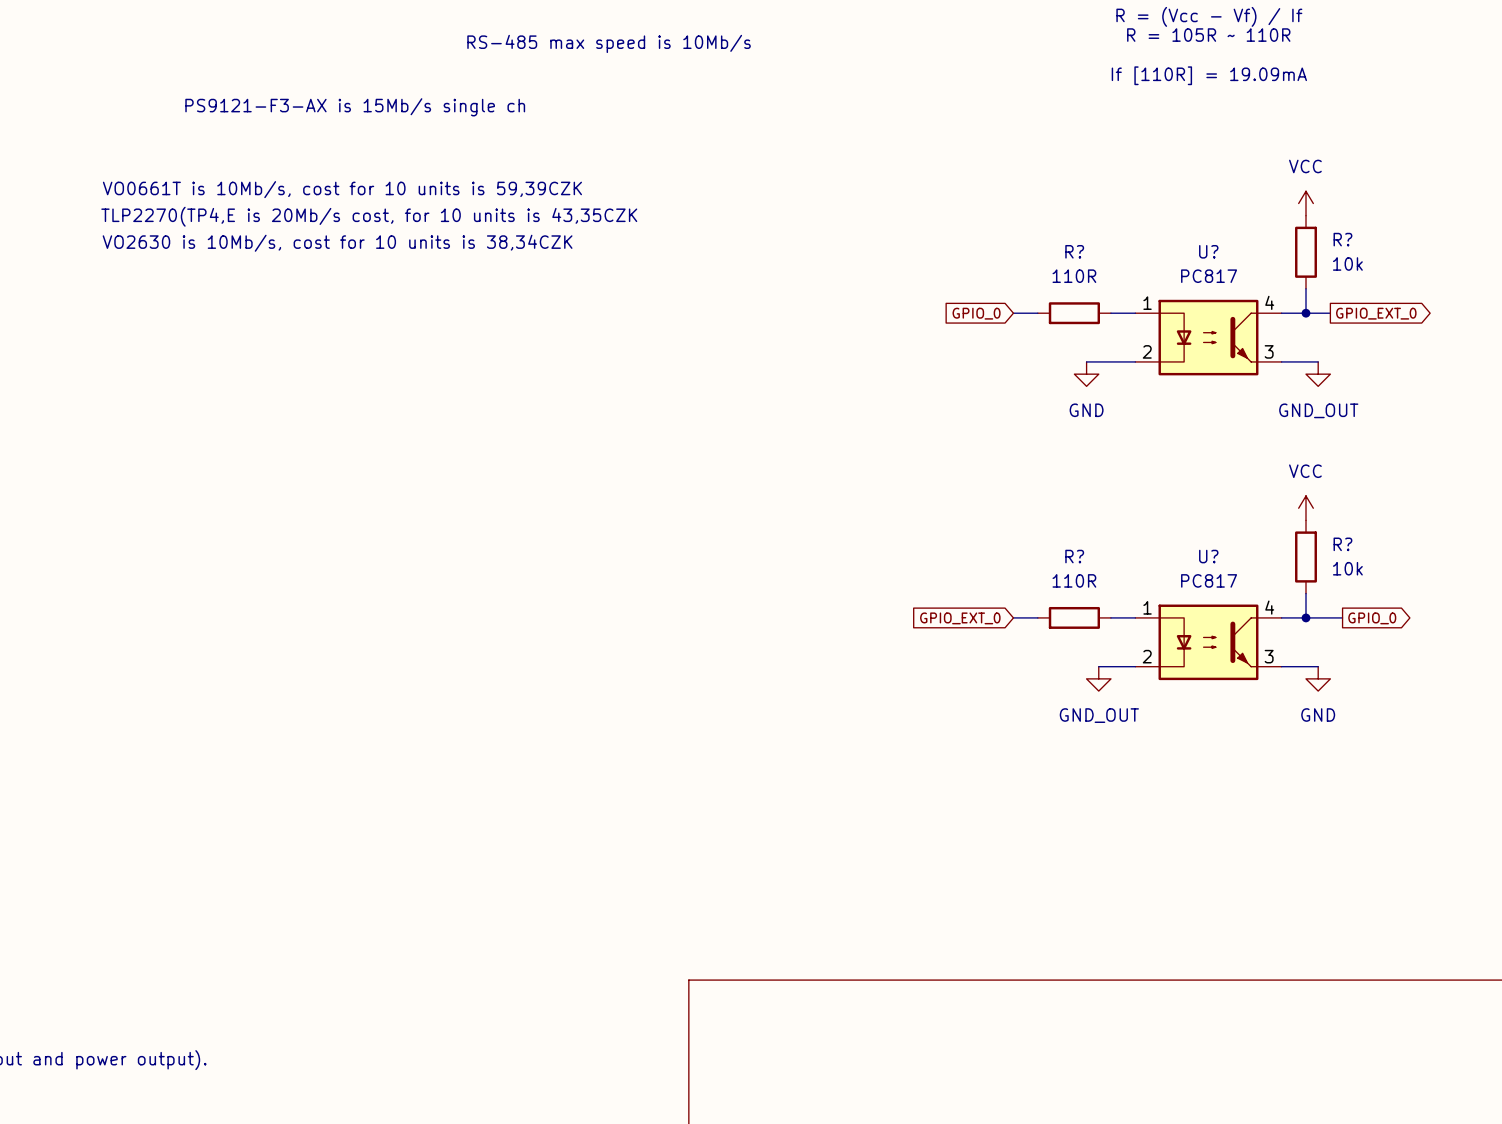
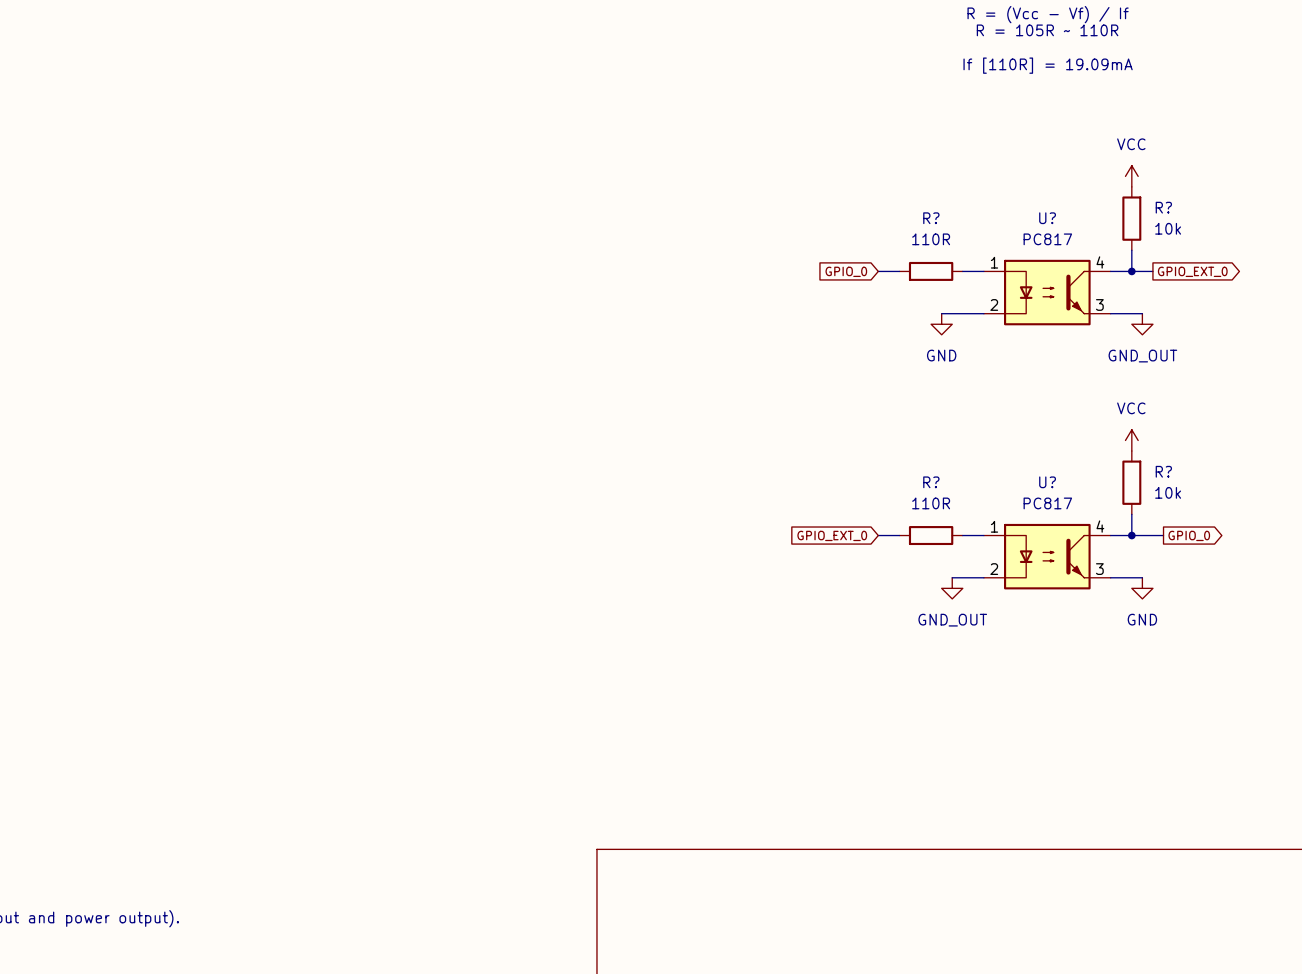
text: RS-485 max speed is 10Mb/s (609, 43) -> none
text: PS9121-F3-AX is 15Mb/s single ch (355, 107) -> none
text: VO0661T is 10Mb/s, cost for 10 units is 59,39CZK (342, 189) -> none
text: TLP2270(TP4,E is 20Mb/s cost, for 10 units is 43,35CZK (369, 216) -> none
text: VO2630 is 10Mb/s, cost for 10 units is 38,34CZK (337, 243) -> none

